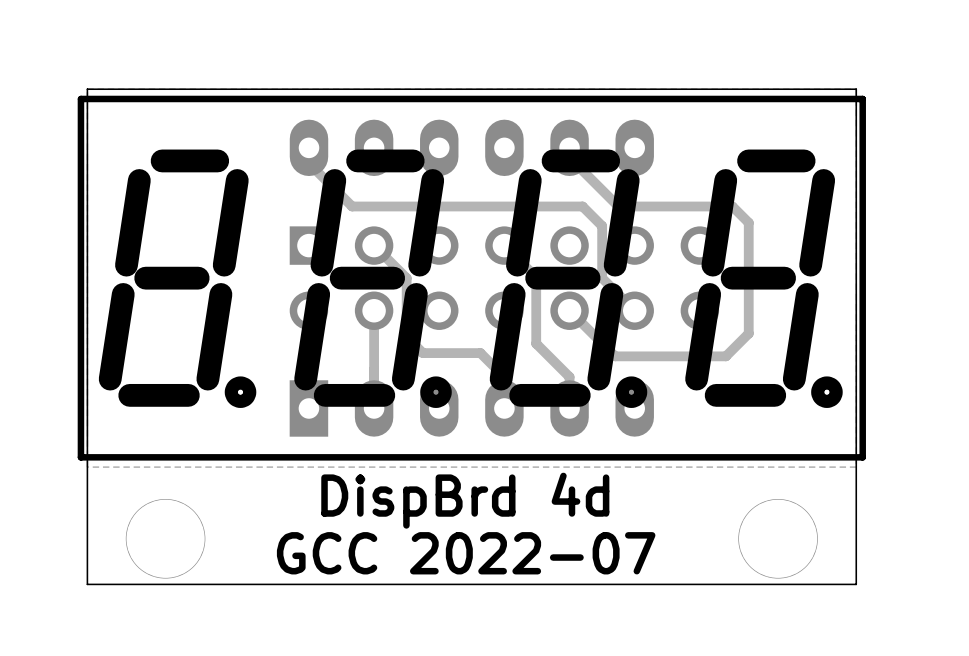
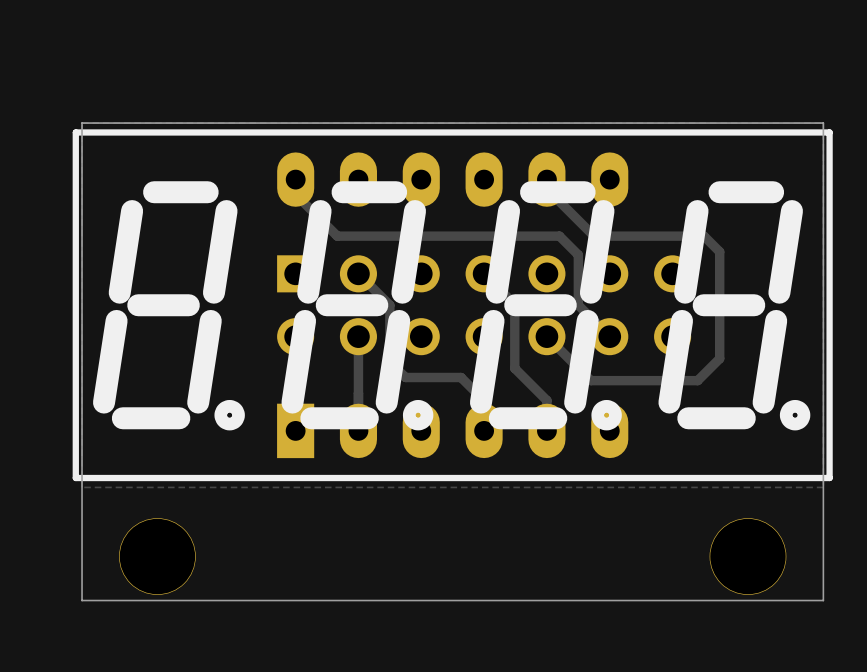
text: DispBrd 4d (465, 500) -> none
text: GCC 2022-07 (466, 553) -> none

